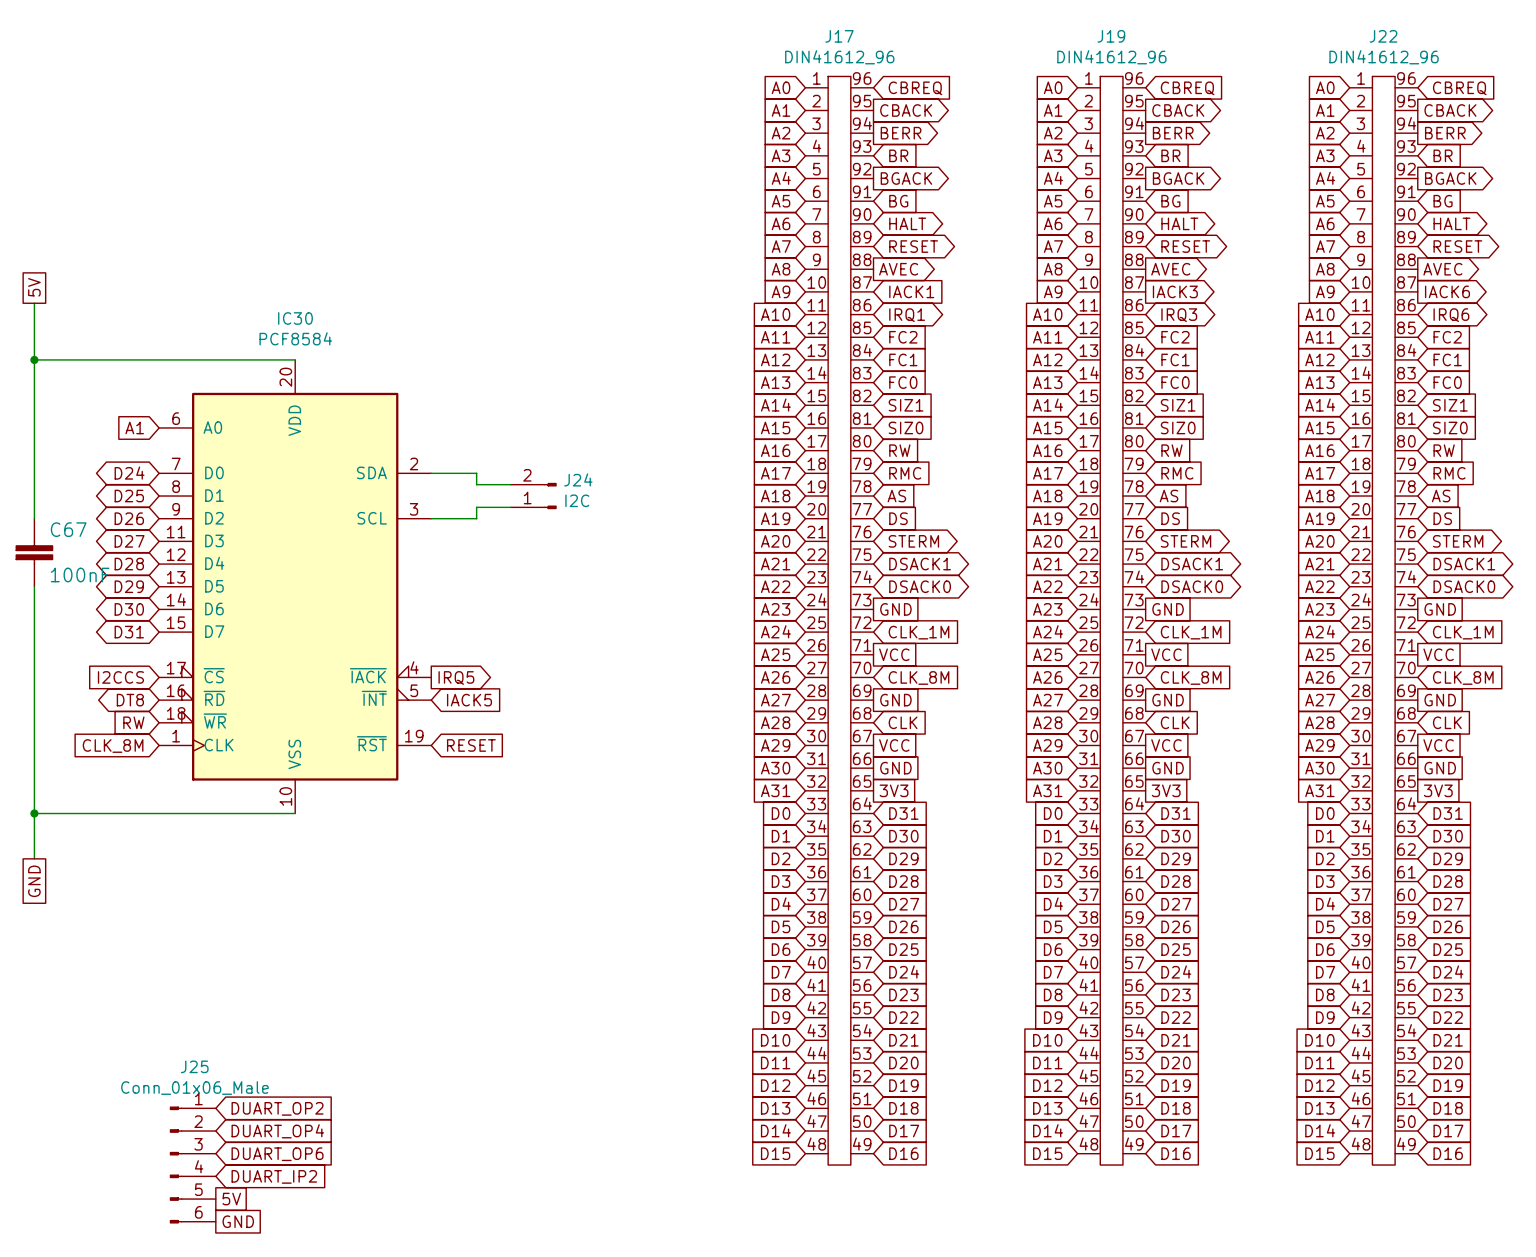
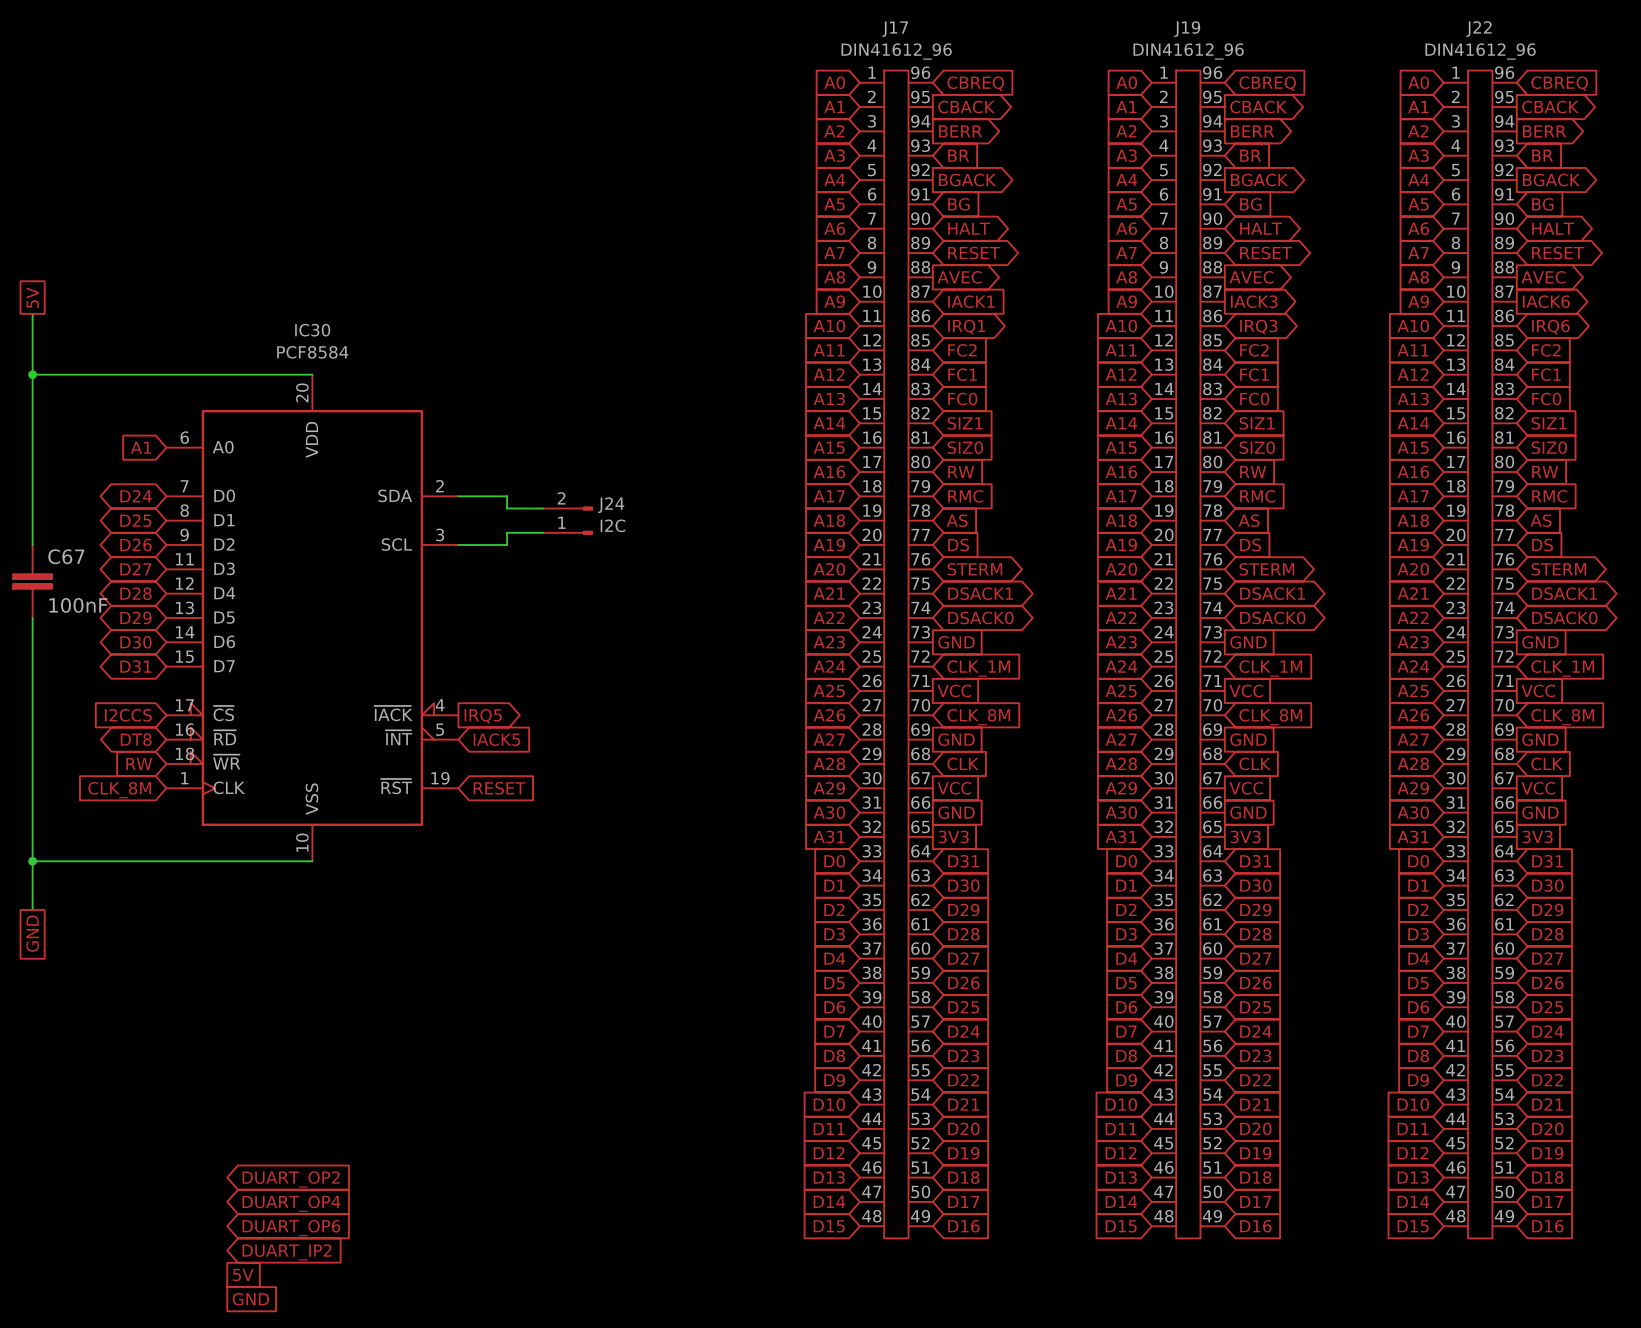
J25: Conn_01x06_Male (192, 1165) -> none

